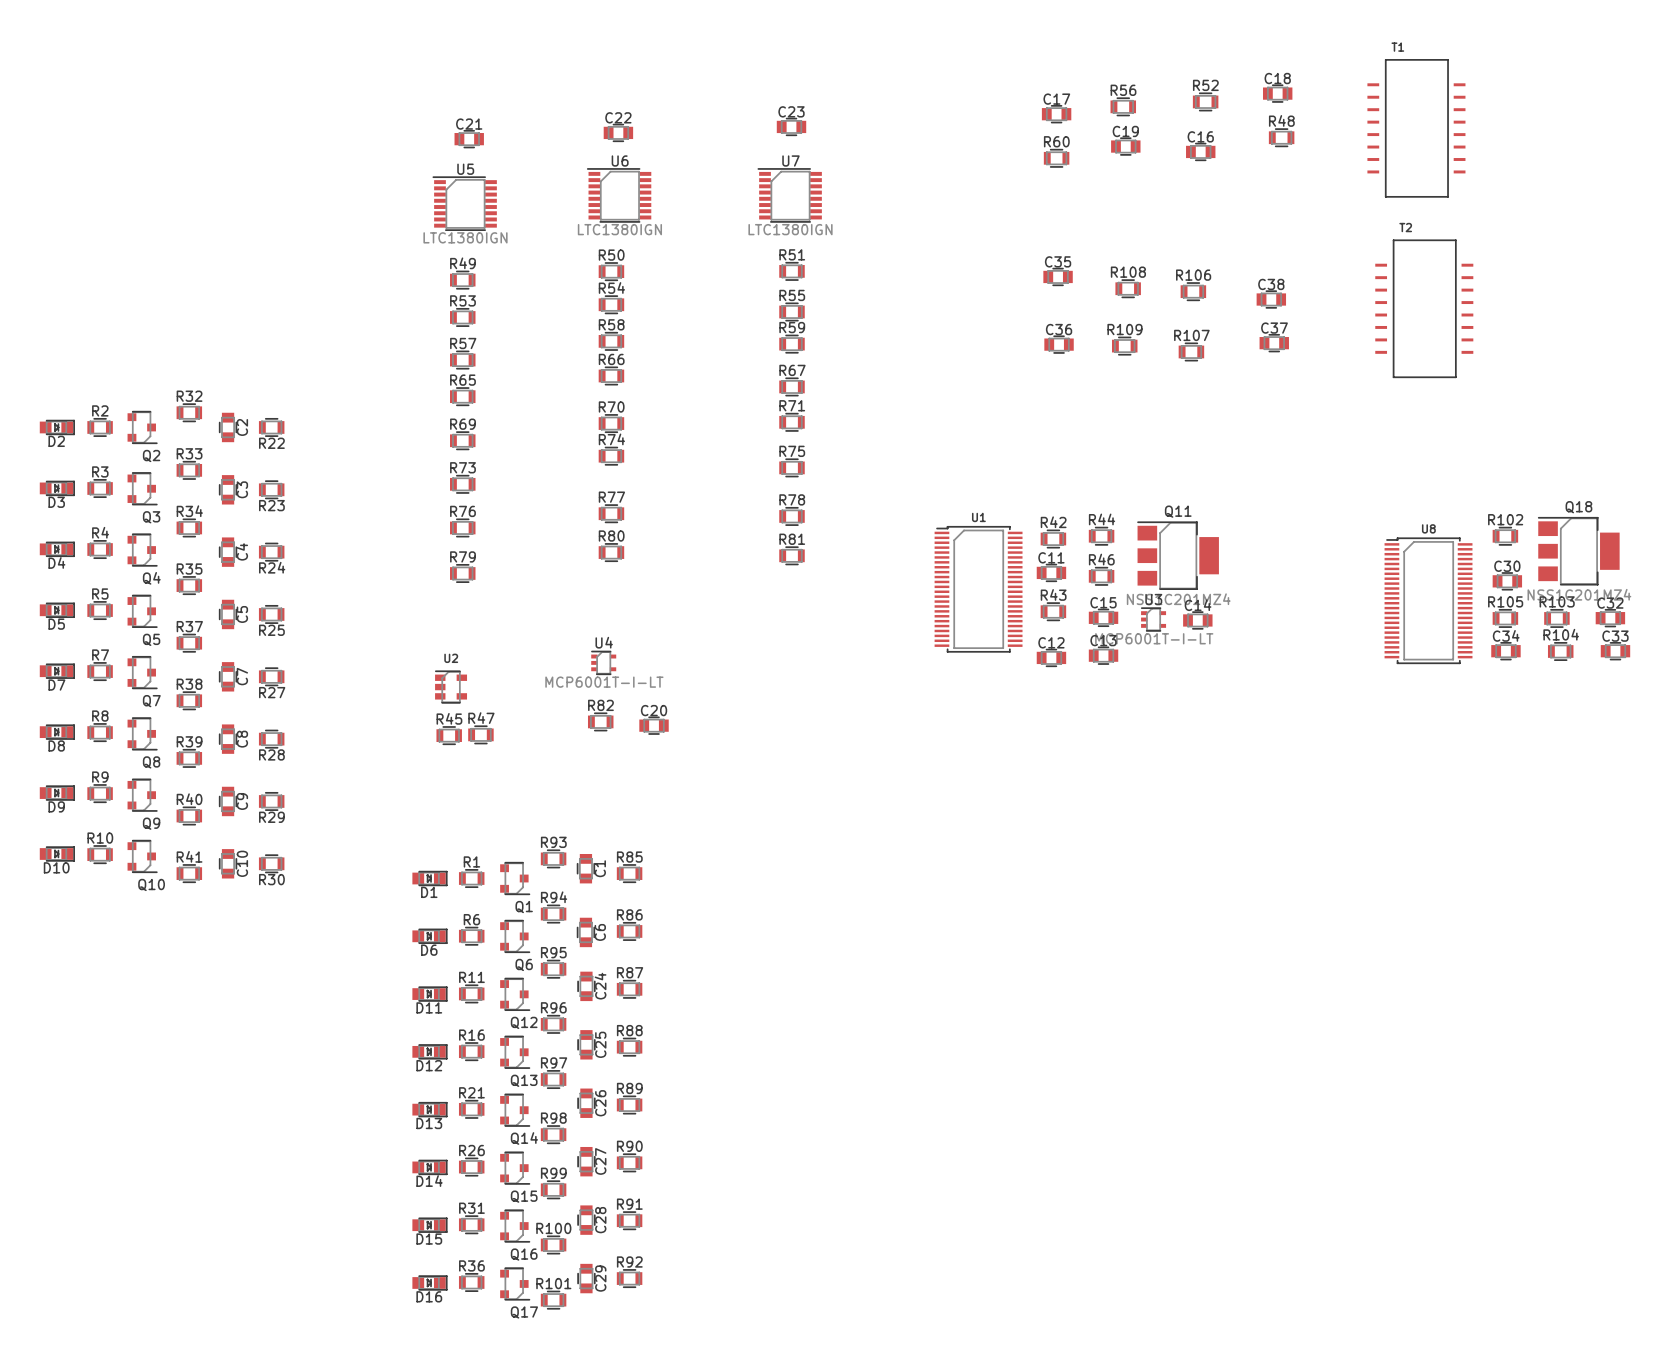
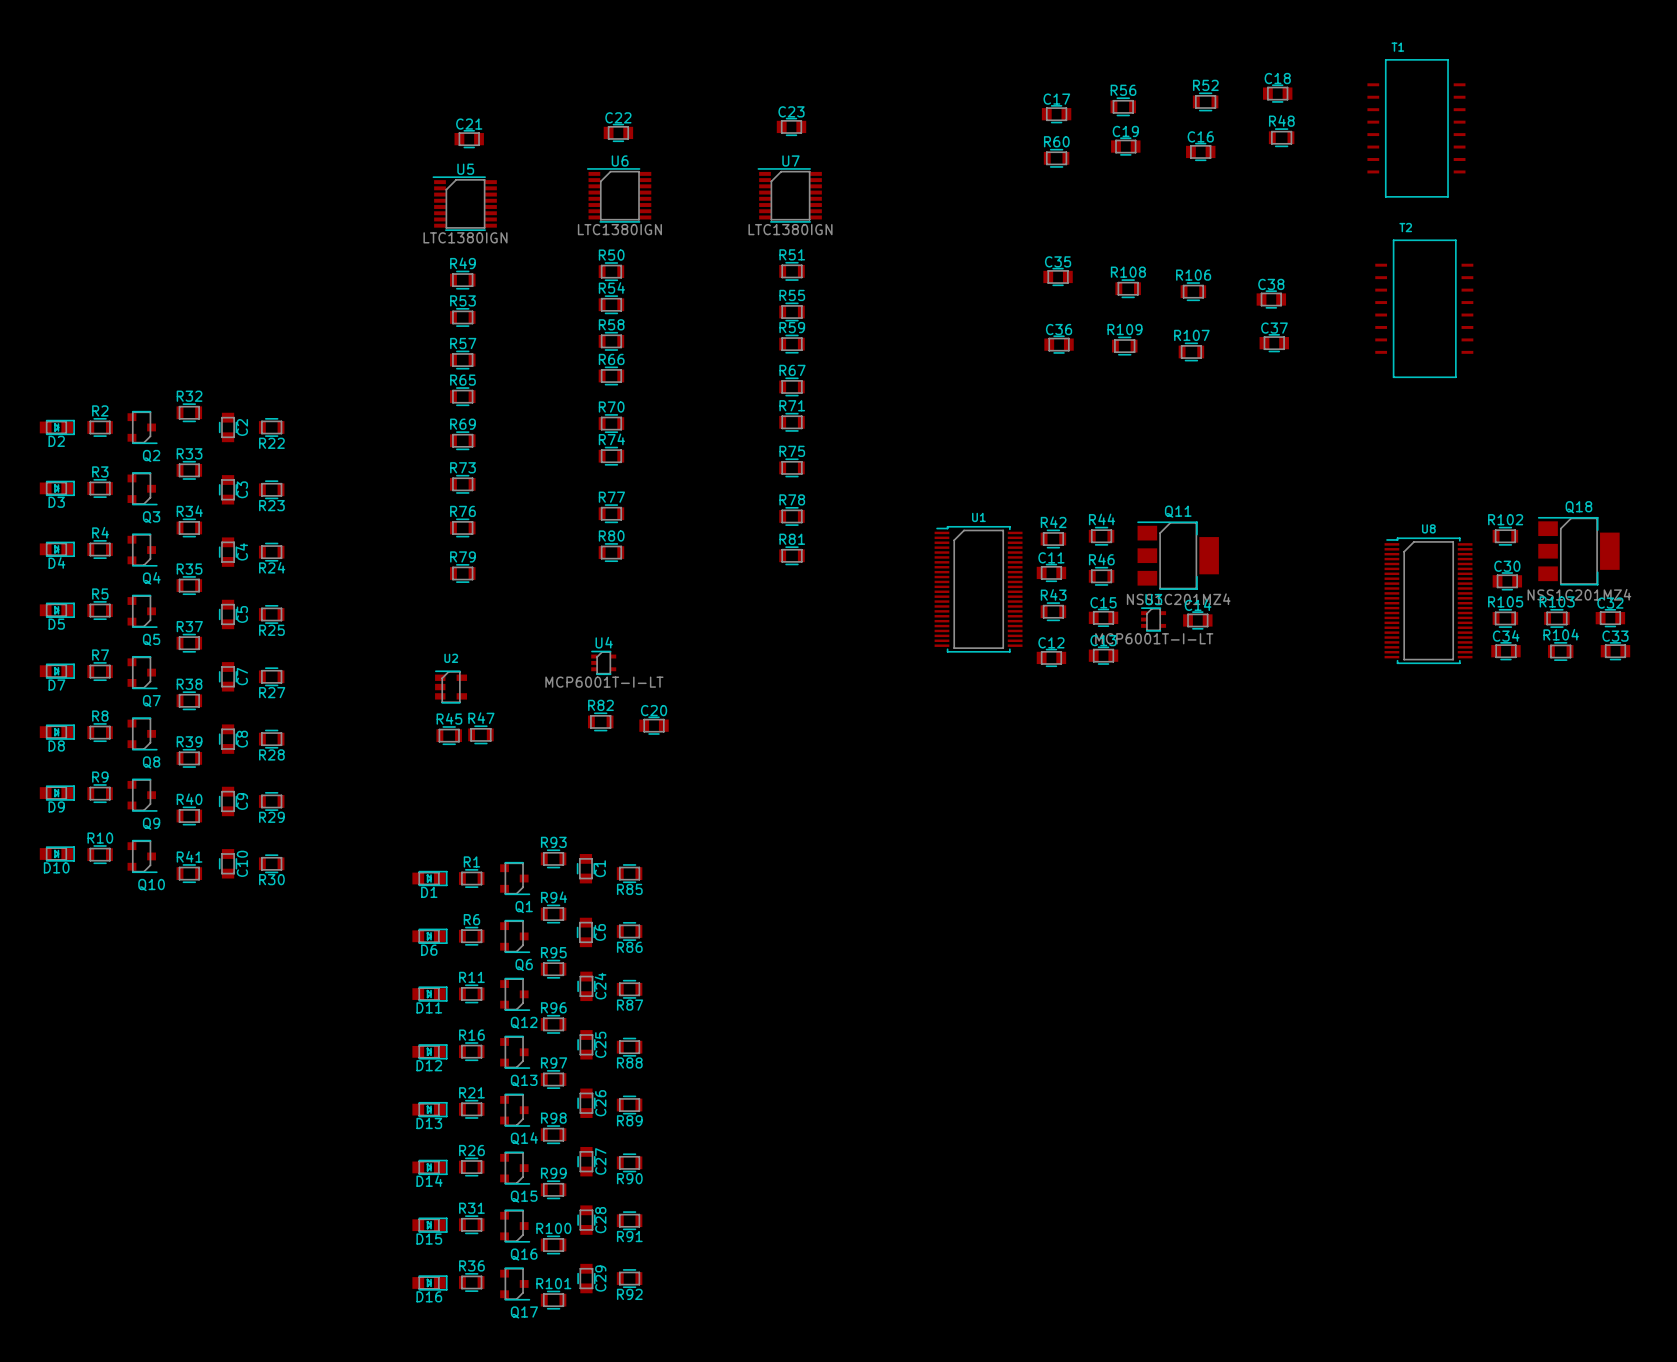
R85 name position: R85 (629, 857) -> R85 (629, 889)
R86 name position: R86 (629, 914) -> R86 (629, 947)
R87 name position: R87 (630, 972) -> R87 (630, 1005)
R88 name position: R88 (629, 1030) -> R88 (629, 1062)
R89 name position: R89 (629, 1088) -> R89 (629, 1120)
R90 name position: R90 (629, 1146) -> R90 (629, 1178)
R91 name position: R91 (629, 1204) -> R91 (629, 1236)
R92 name position: R92 (629, 1262) -> R92 (629, 1294)

